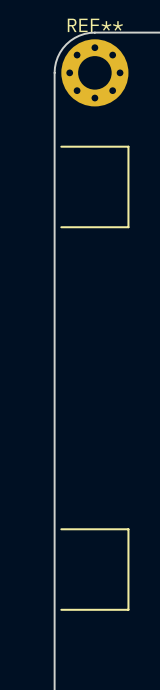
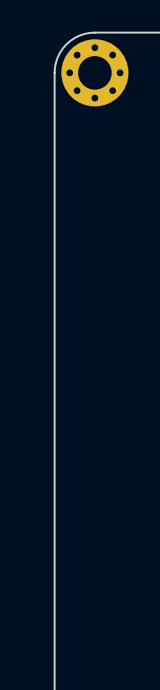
REF** name: REF** (95, 25) -> none
line: (61, 146) (128, 146) (128, 227) (61, 227) -> none
line: (61, 529) (128, 529) (128, 609) (61, 609) -> none

